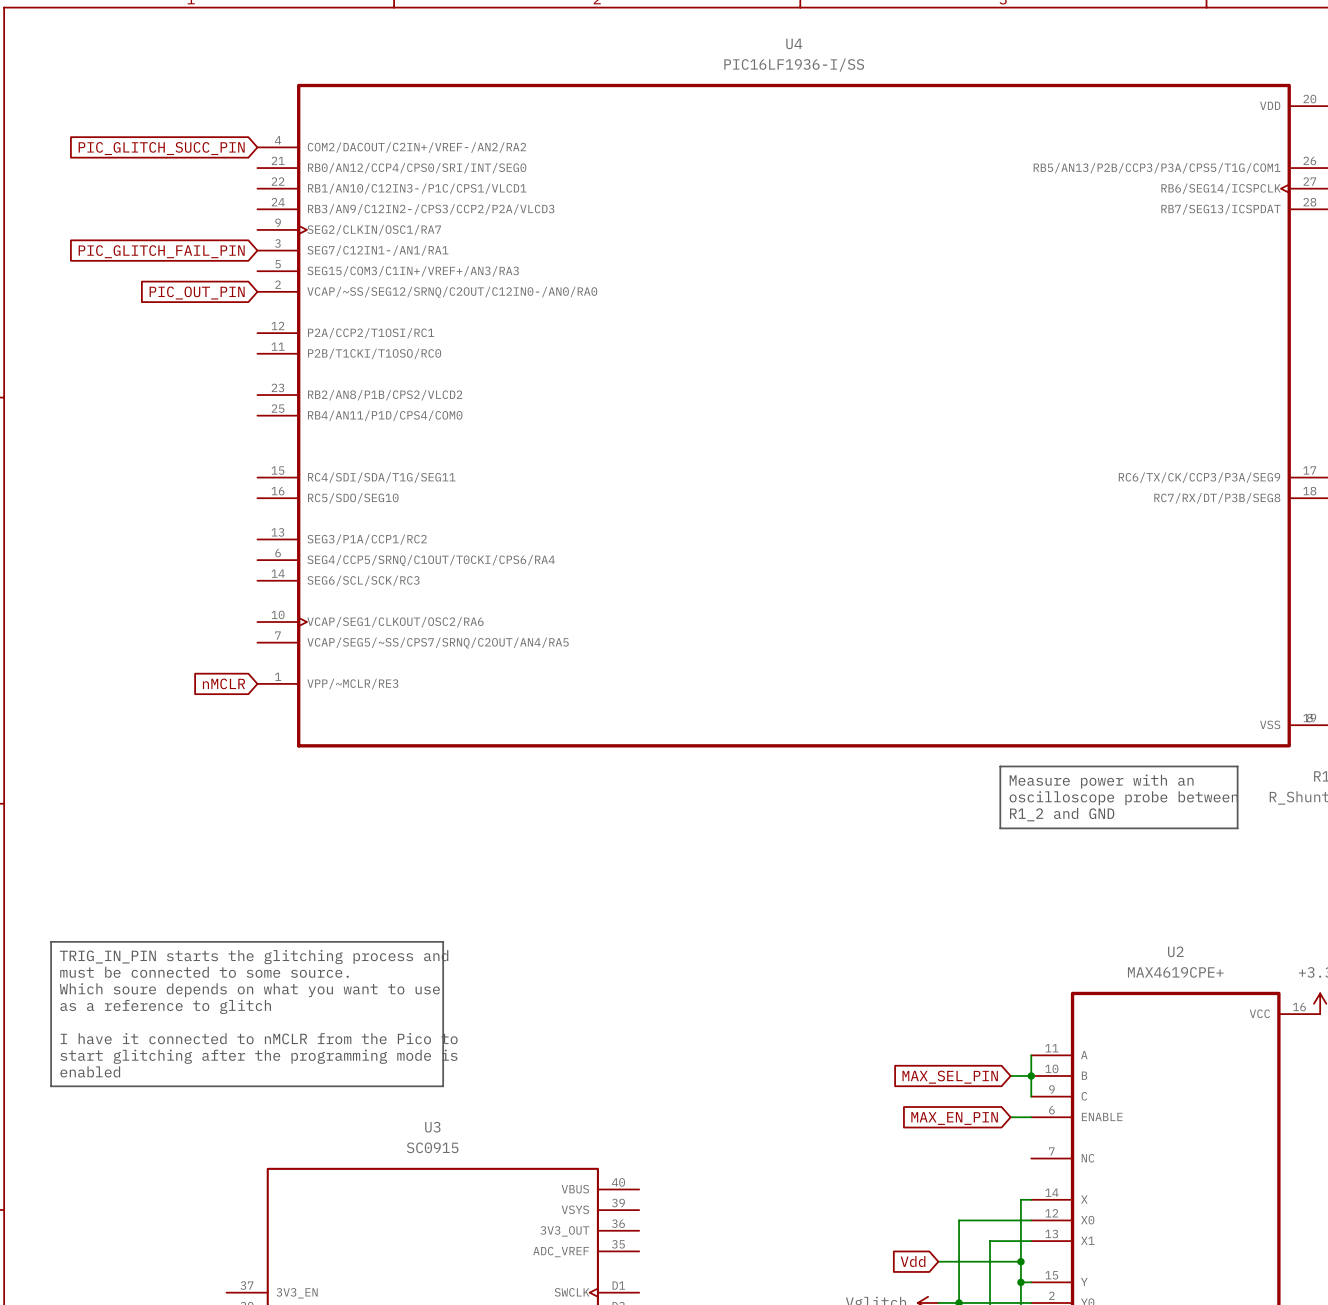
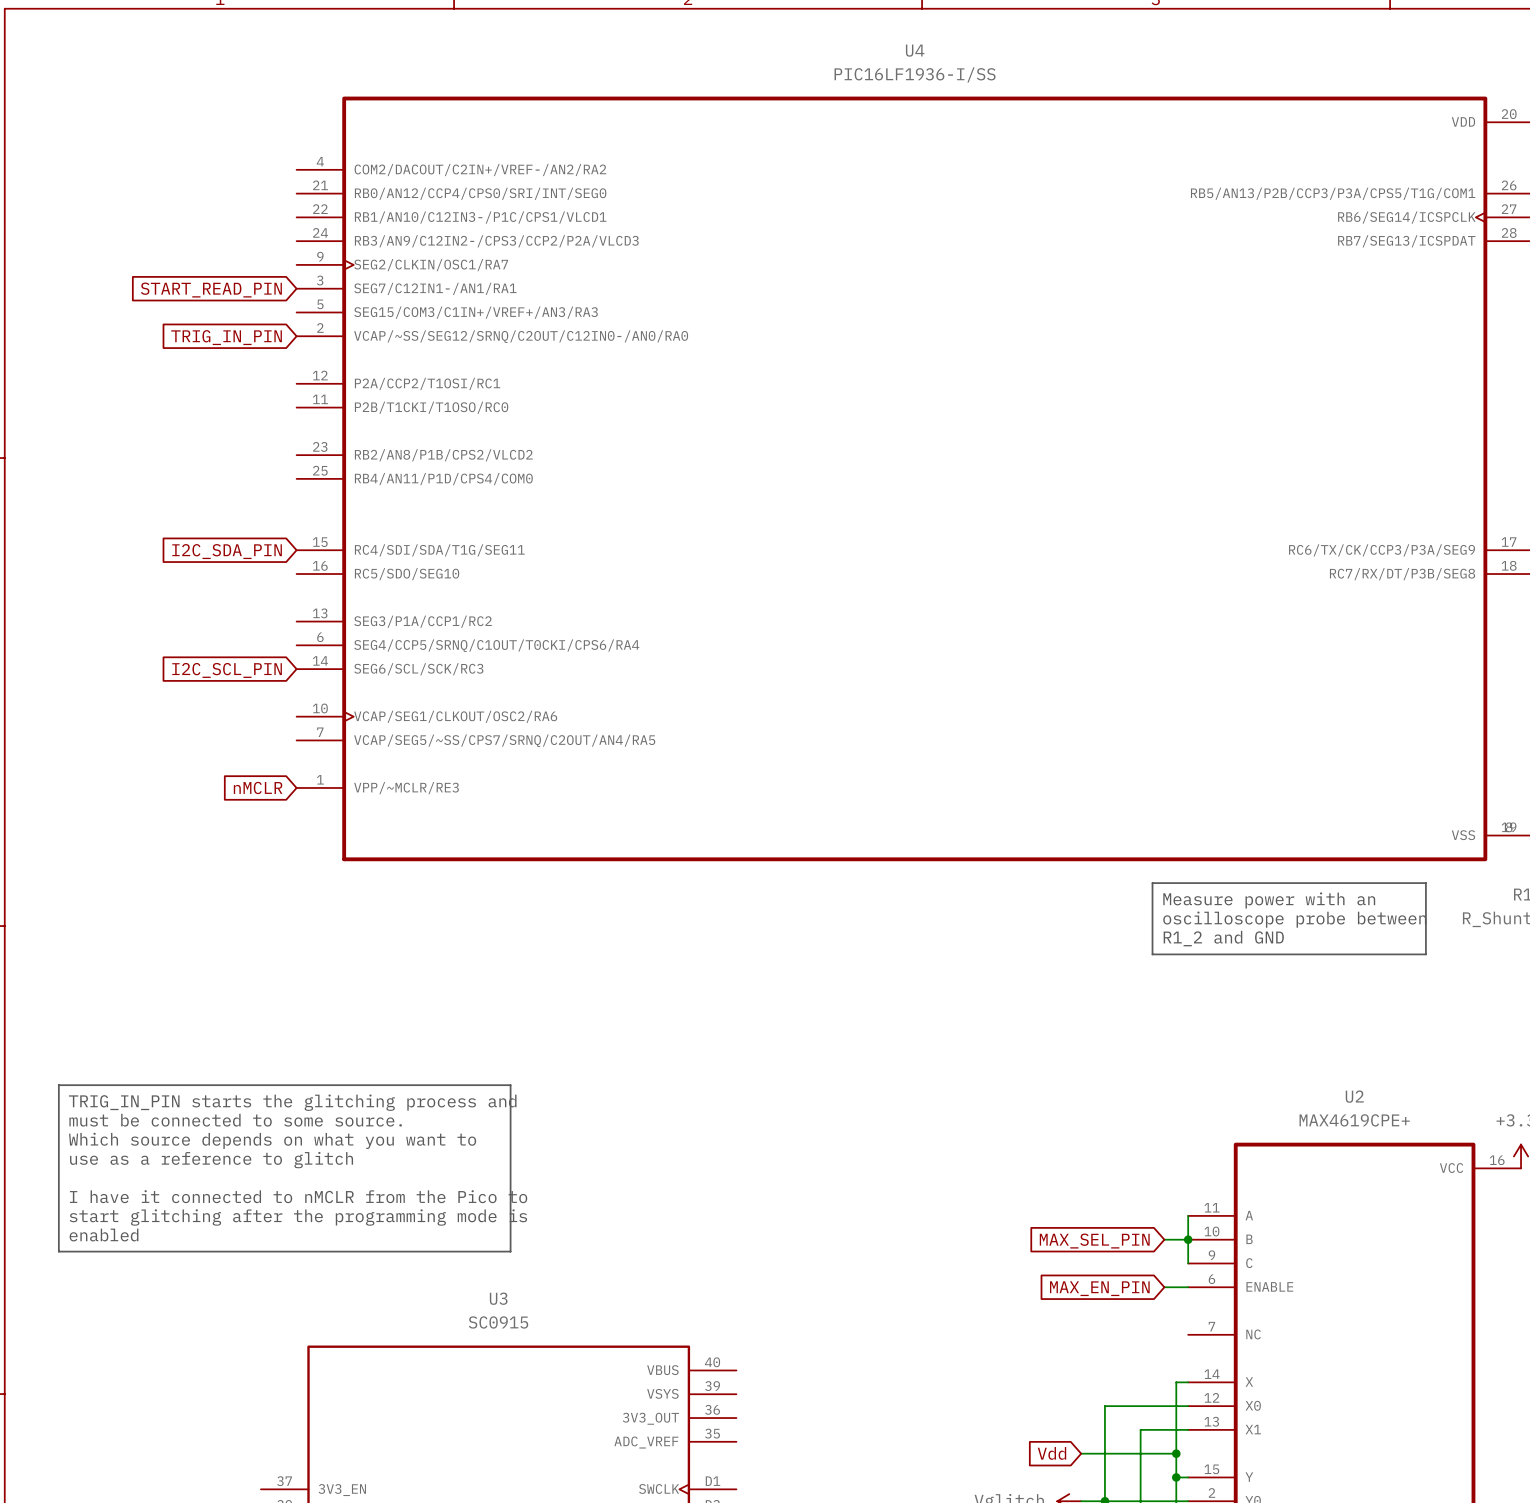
global label: PIC_GLITCH_SUCC_PIN (161, 148) -> none
global label: PIC_GLITCH_FAIL_PIN (161, 251) -> START_READ_PIN (211, 290)
global label: PIC_OUT_PIN (197, 293) -> TRIG_IN_PIN (226, 337)
global label: none -> I2C_SDA_PIN (227, 551)
global label: none -> I2C_SCL_PIN (227, 670)
text: Which soure depends on what you want to use (249, 990) -> Which source depends on what you want to (272, 1140)
text: as a reference to glitch (165, 1006) -> use as a reference to glitch (211, 1160)

